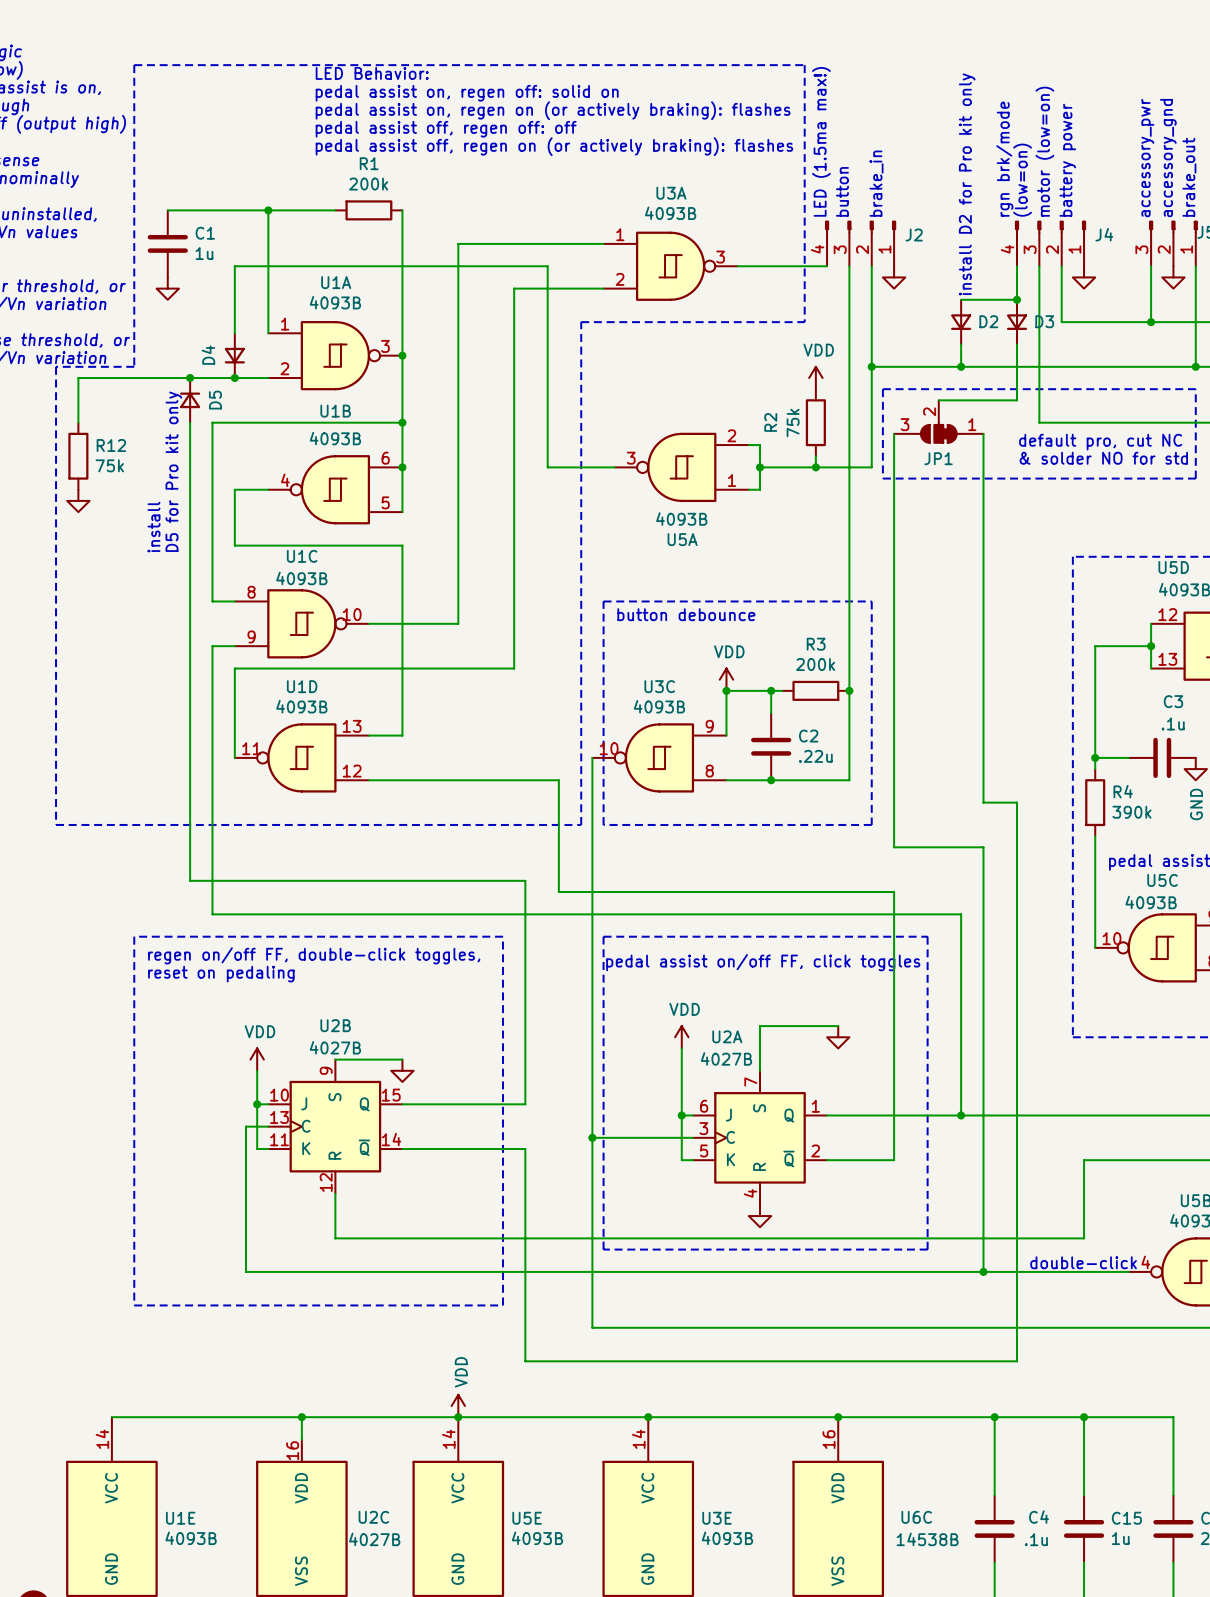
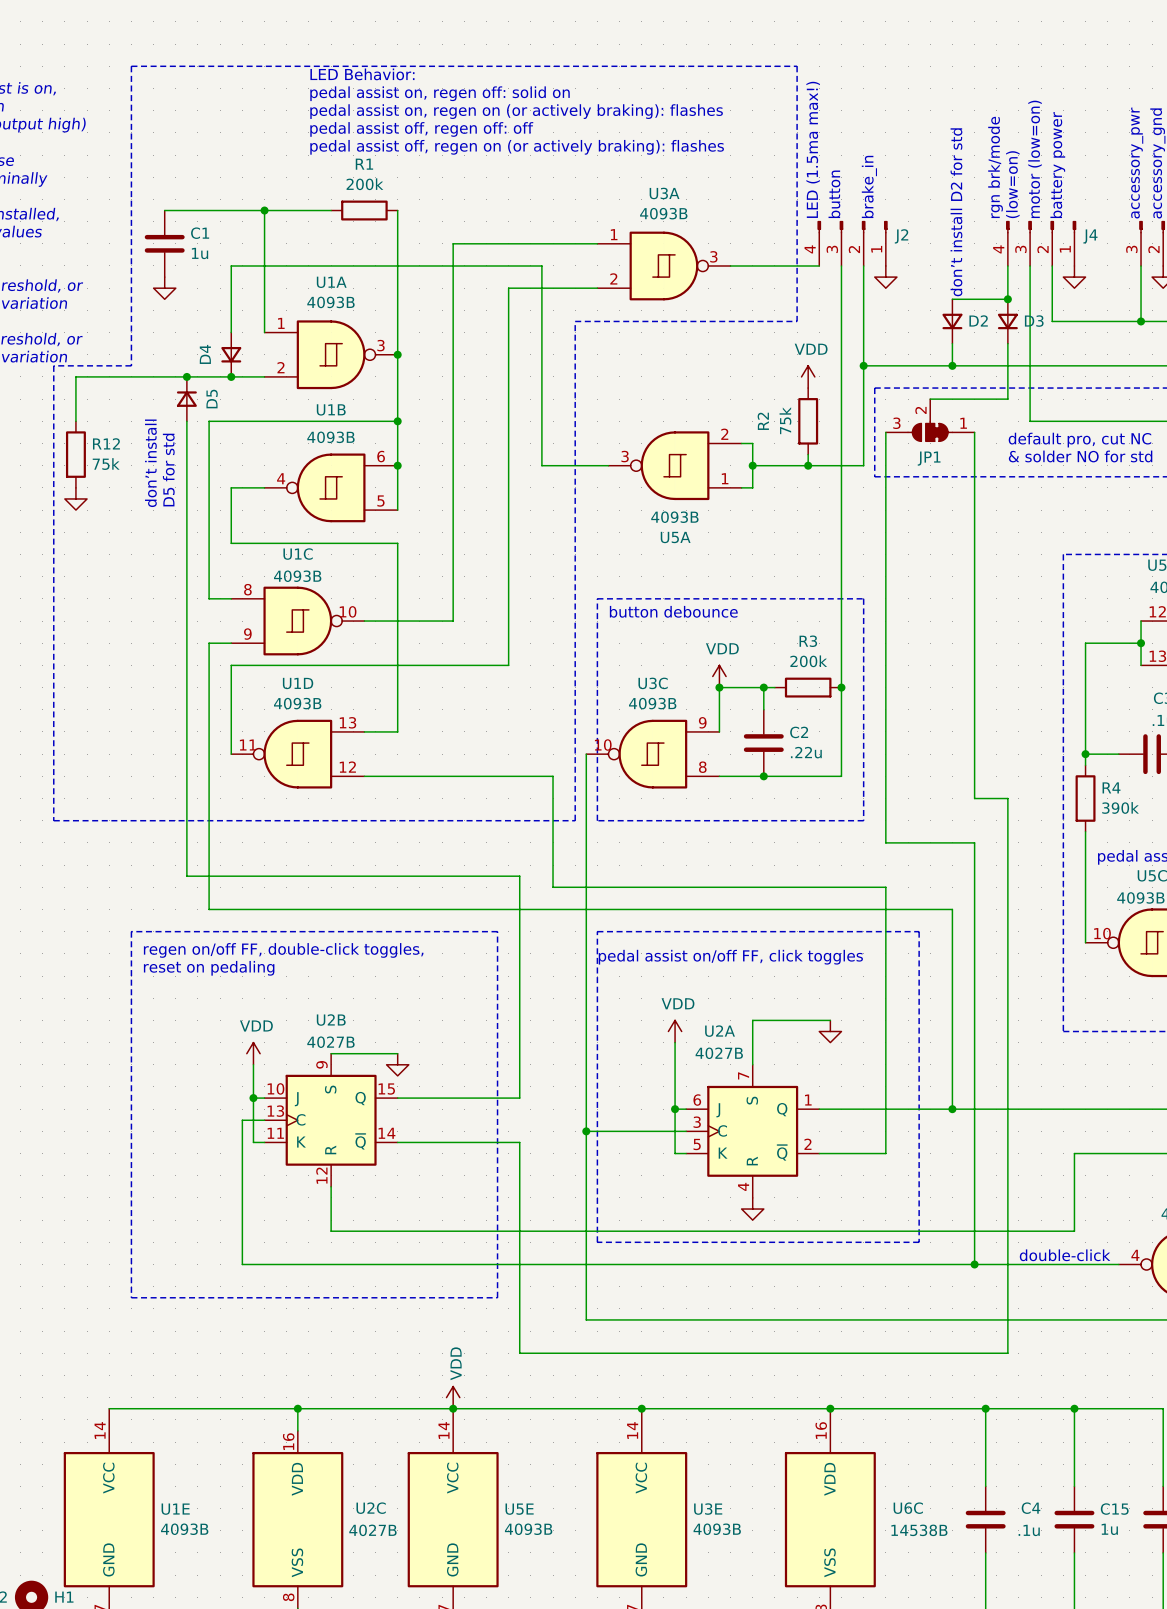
text: install D2 for Pro kit only (967, 184) -> don’t install D2 for std (956, 212)
text: none -> D5 for std (168, 470)
text: D5 for Pro kit only (173, 471) -> none
text: install (154, 527) -> don’t install (150, 463)

